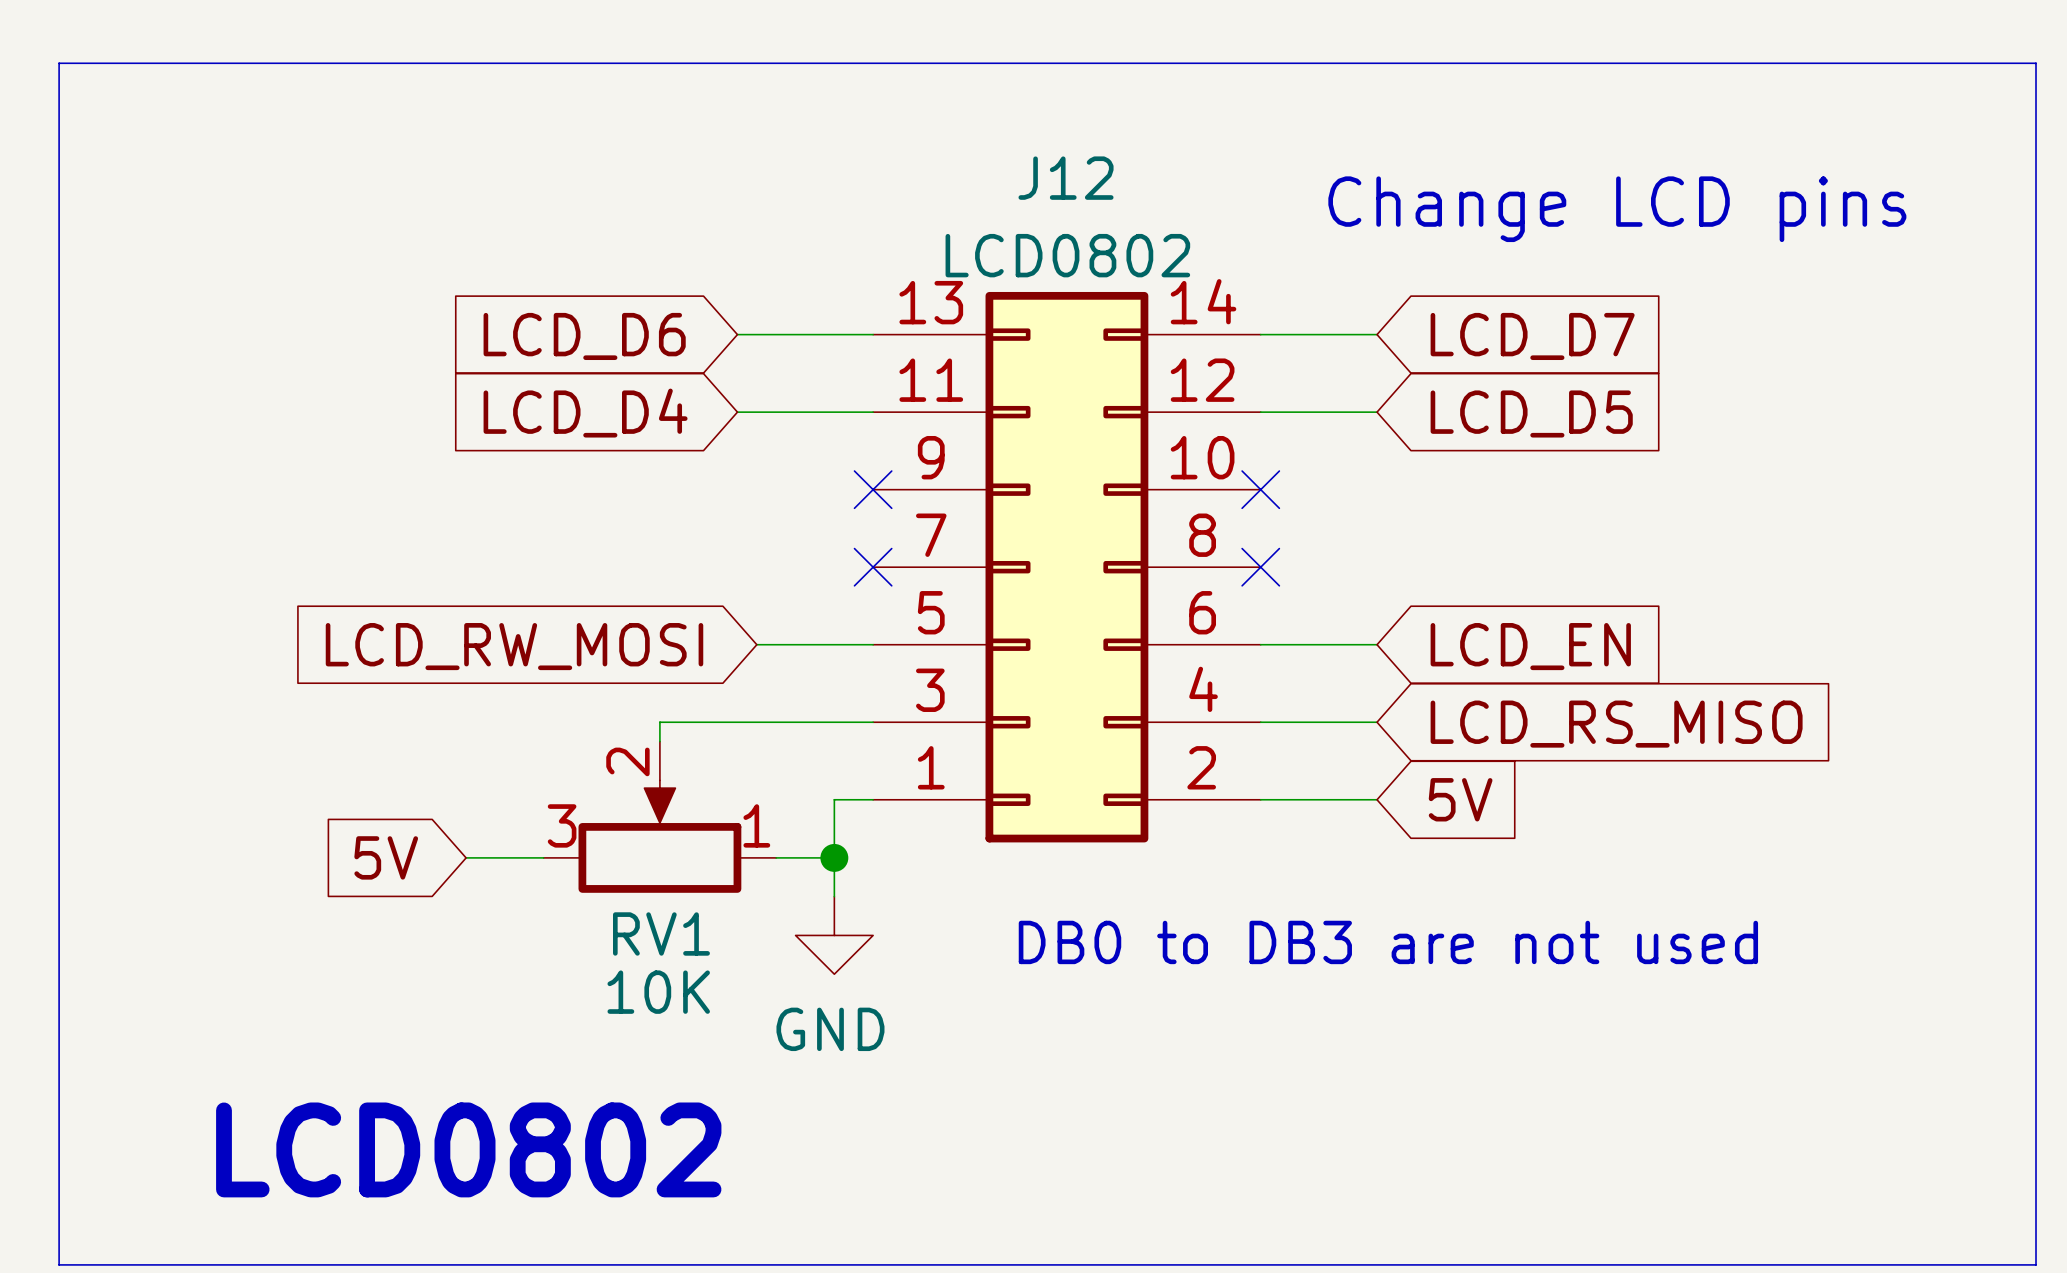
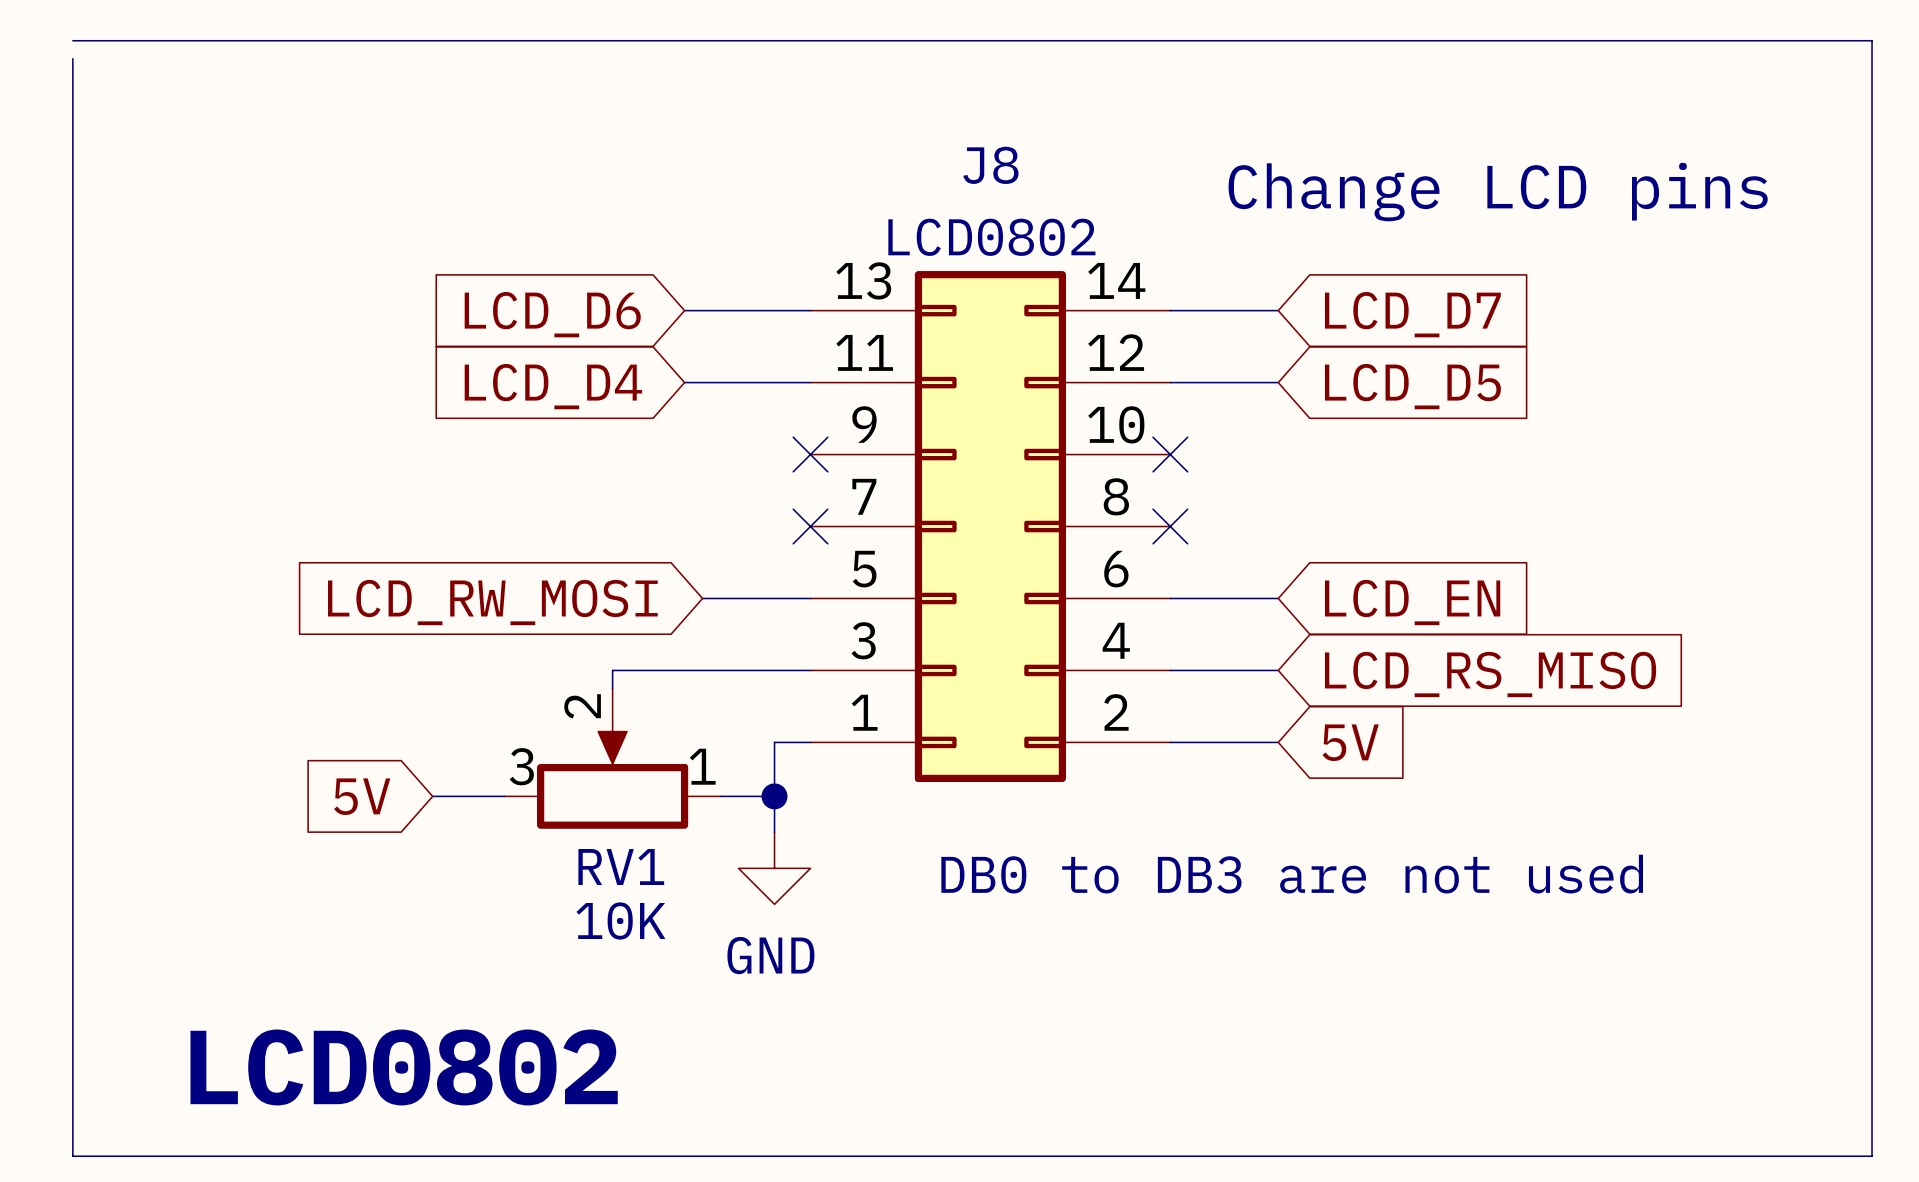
line: none -> (72, 40) (1872, 40) (1872, 1156) (72, 1156) (72, 58)
line: (59, 63) (2036, 63) (2036, 1264) (59, 1264) (59, 63) -> none
J12 name: J12 (1066, 178) -> J8 (990, 165)

